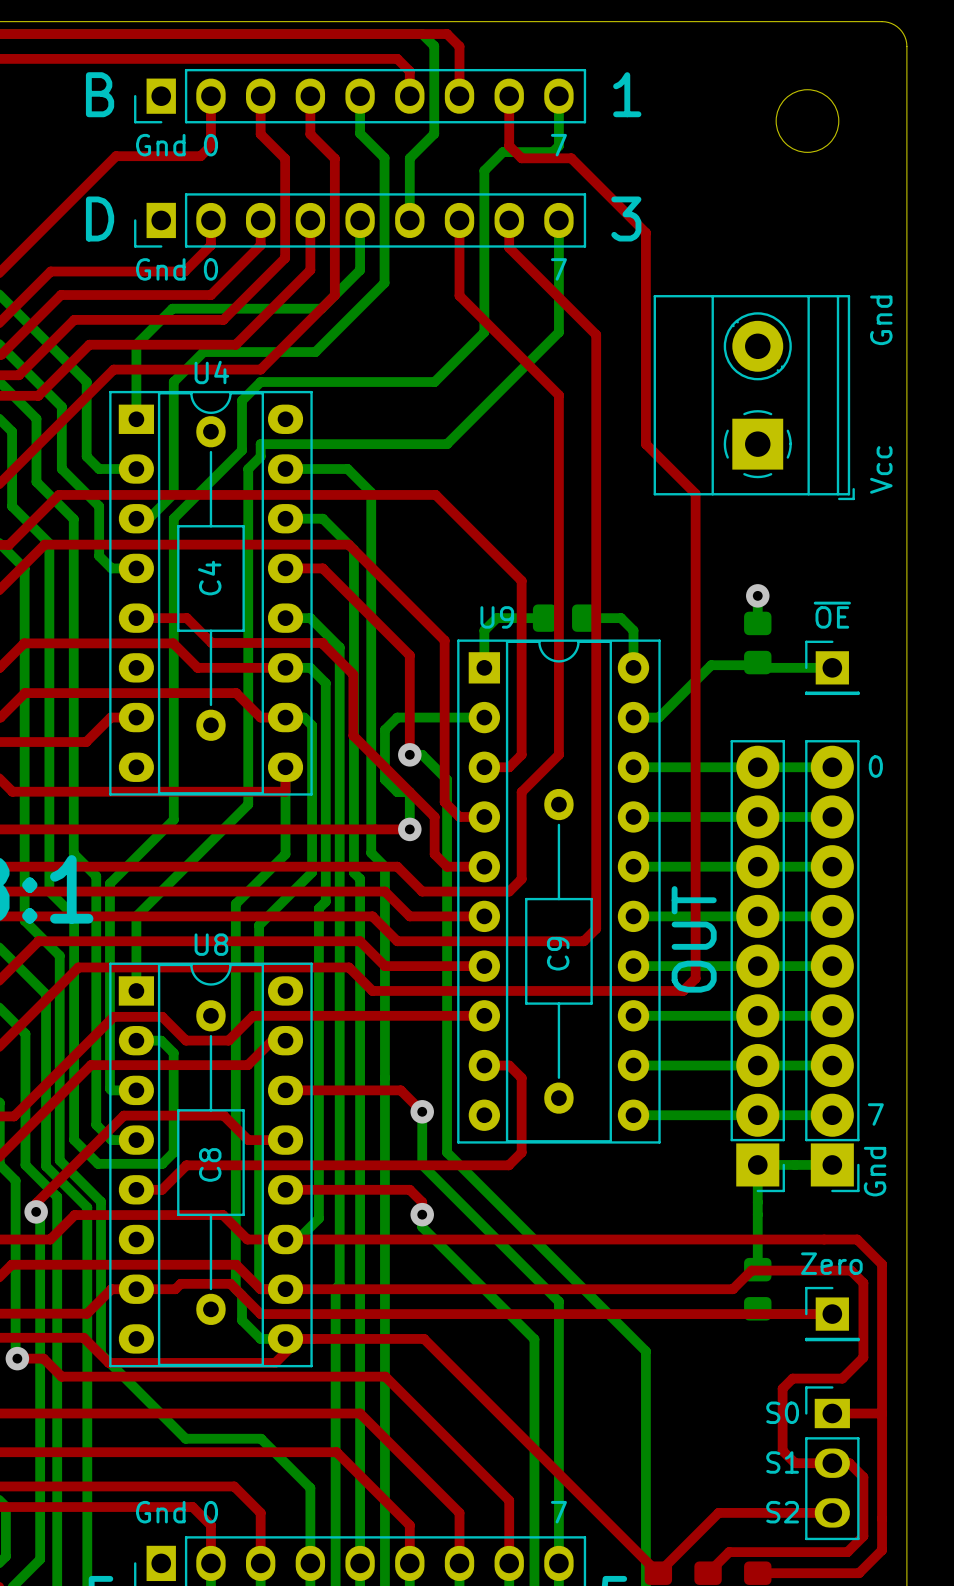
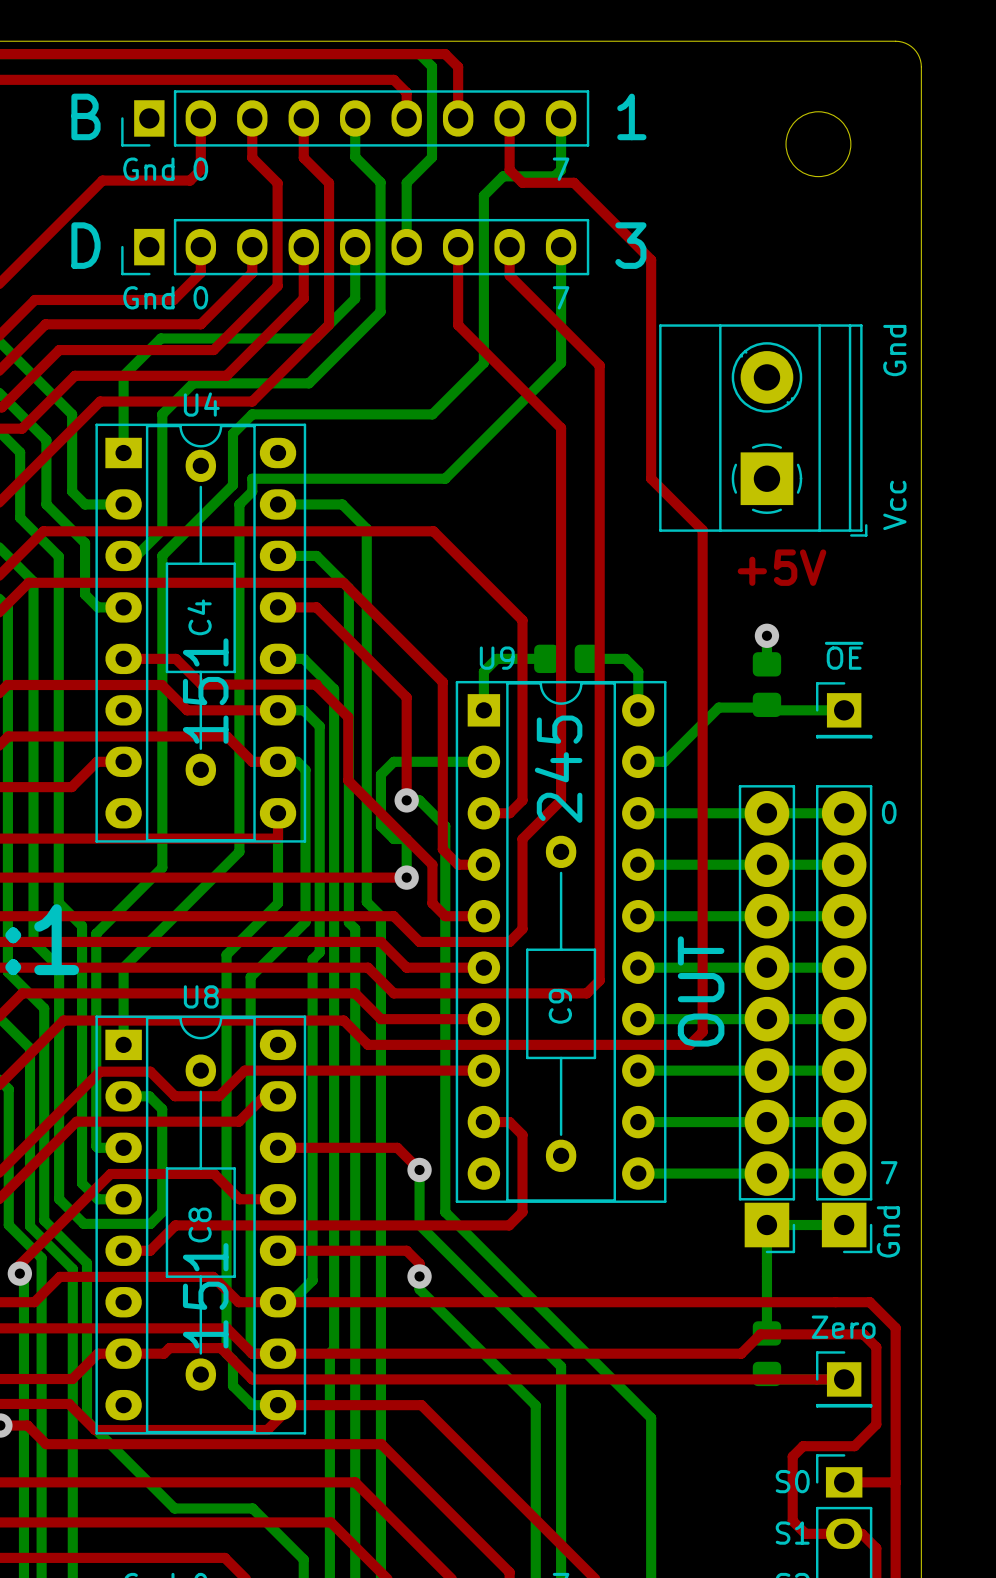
text: none -> +5V (782, 567)
text: none -> 151 (205, 691)
text: none -> 245 (558, 769)
text: none -> 151 (205, 1295)

